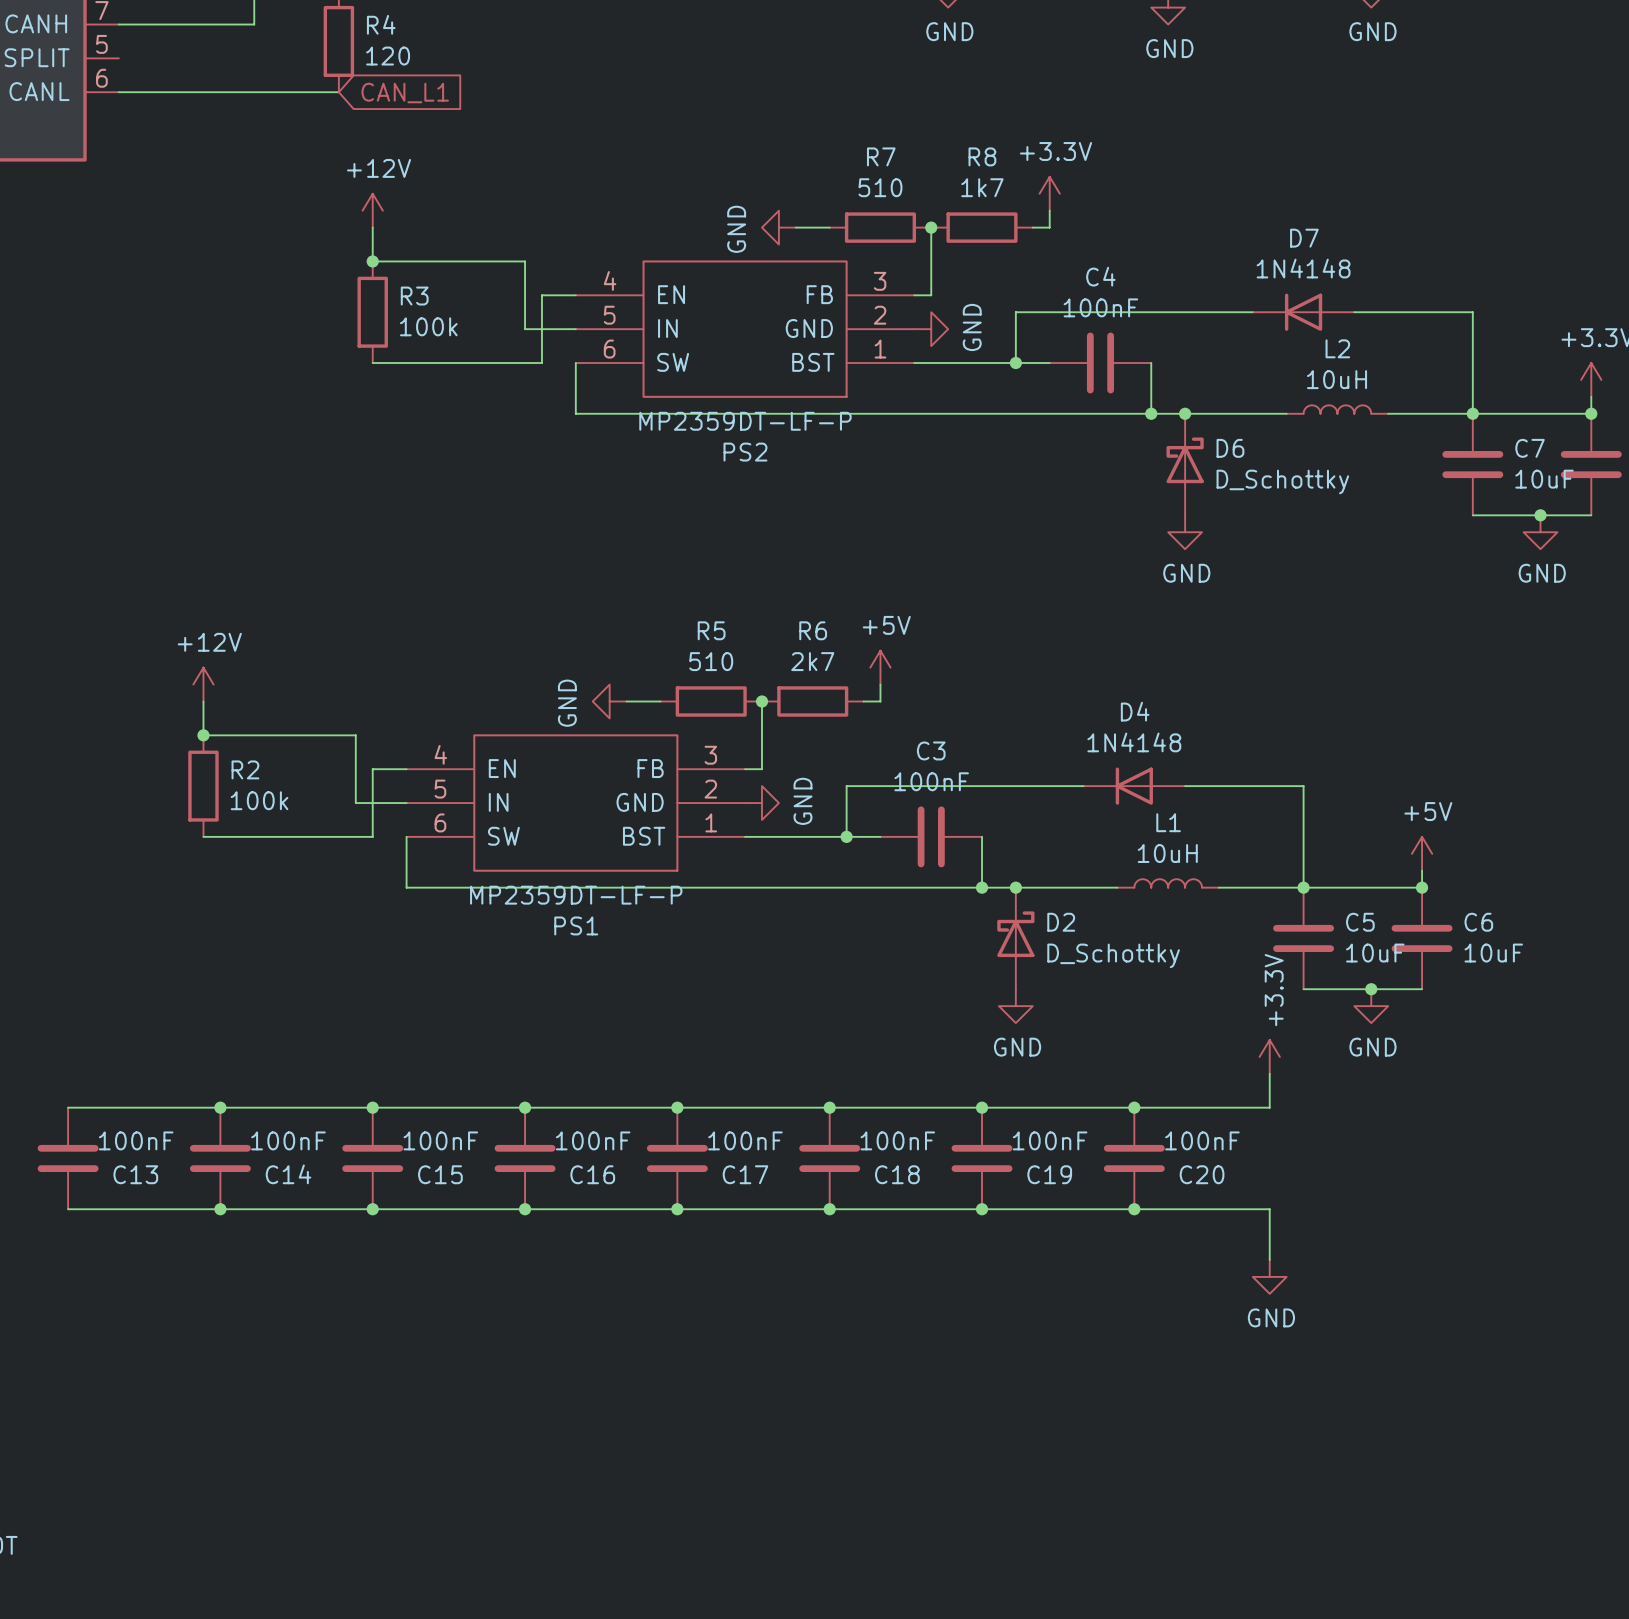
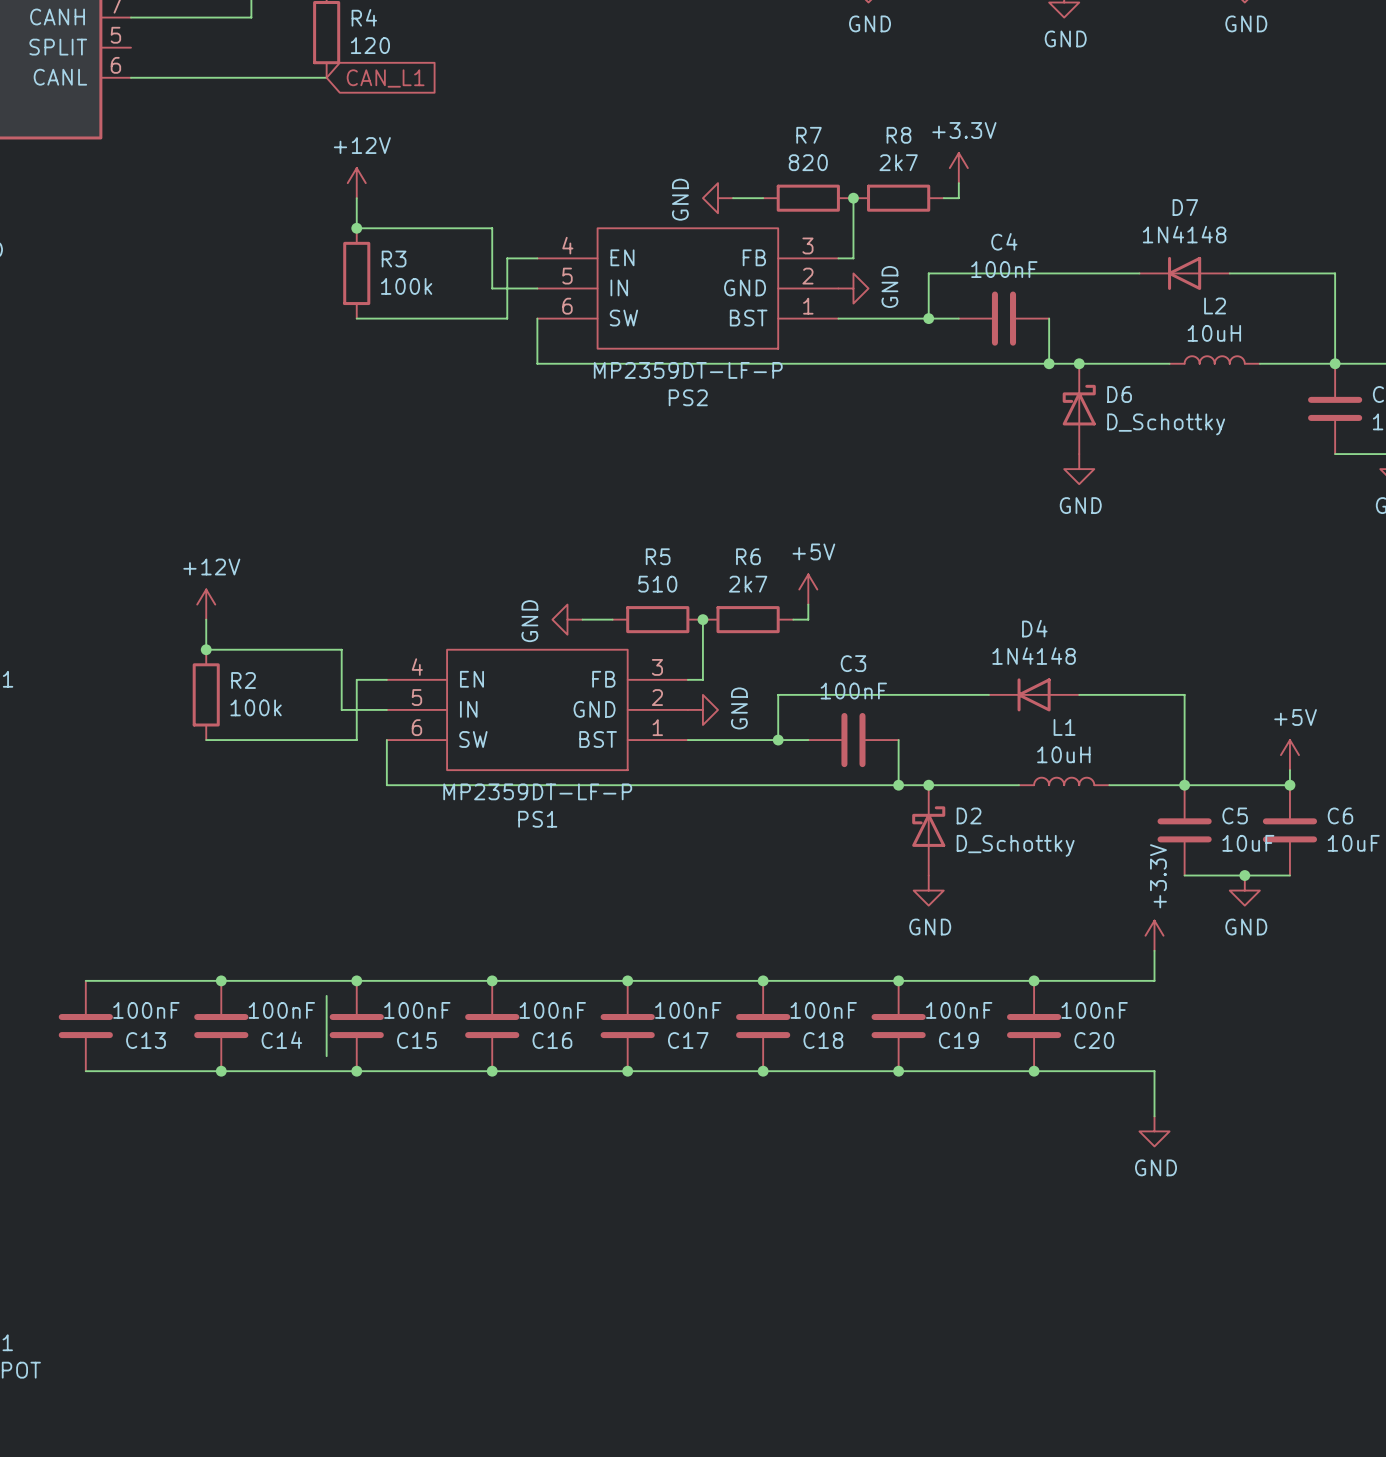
R7 value: 510 (880, 187) -> 820 (808, 162)
R8 value: 1k7 (982, 187) -> 2k7 (898, 162)
wire: none -> (326, 995) (326, 1056)

